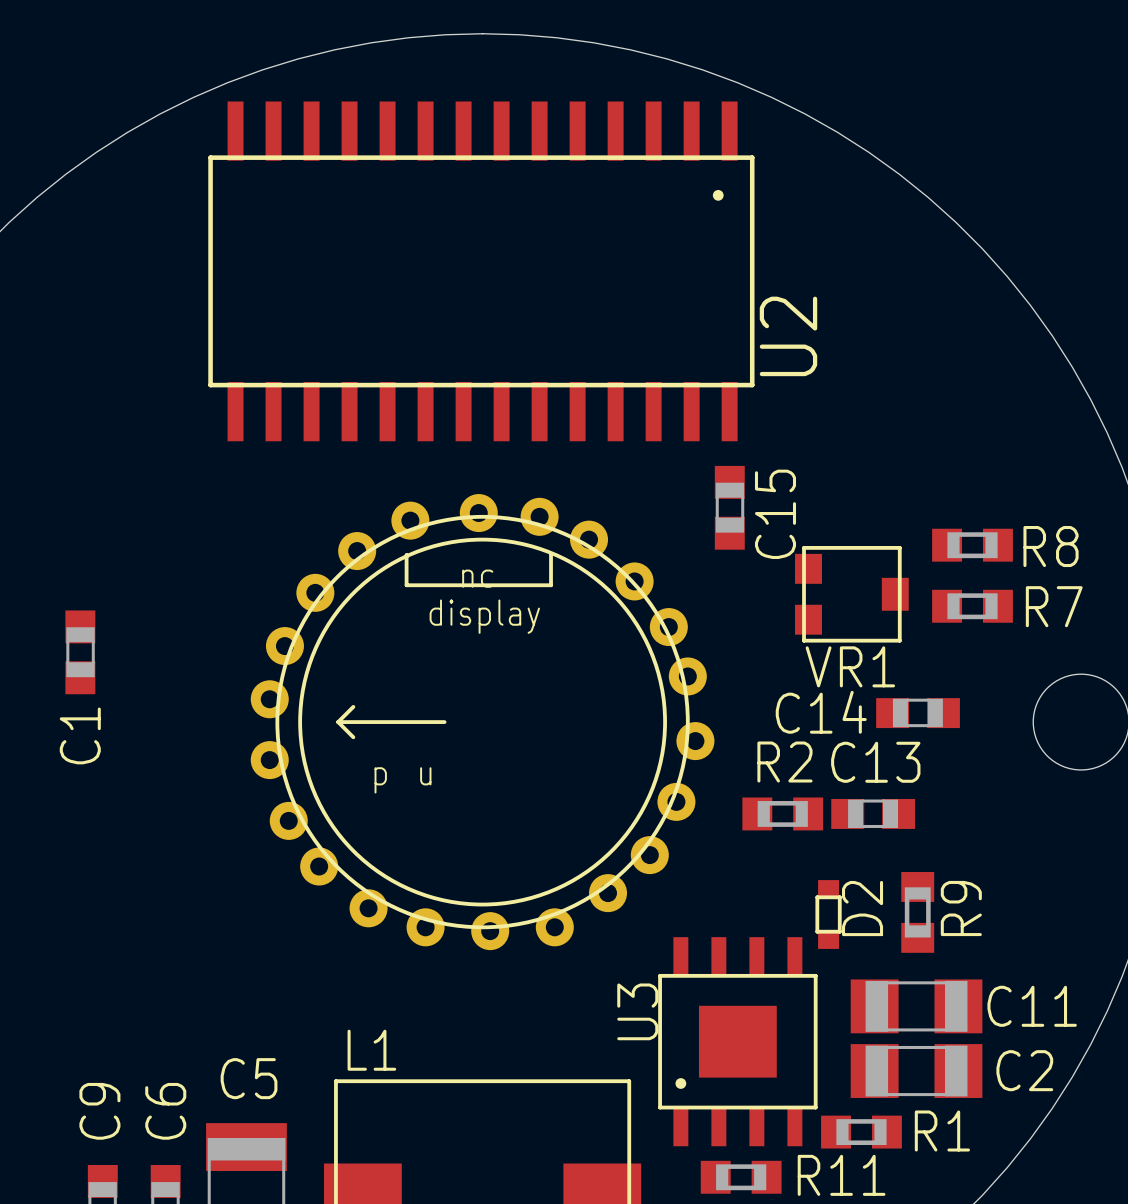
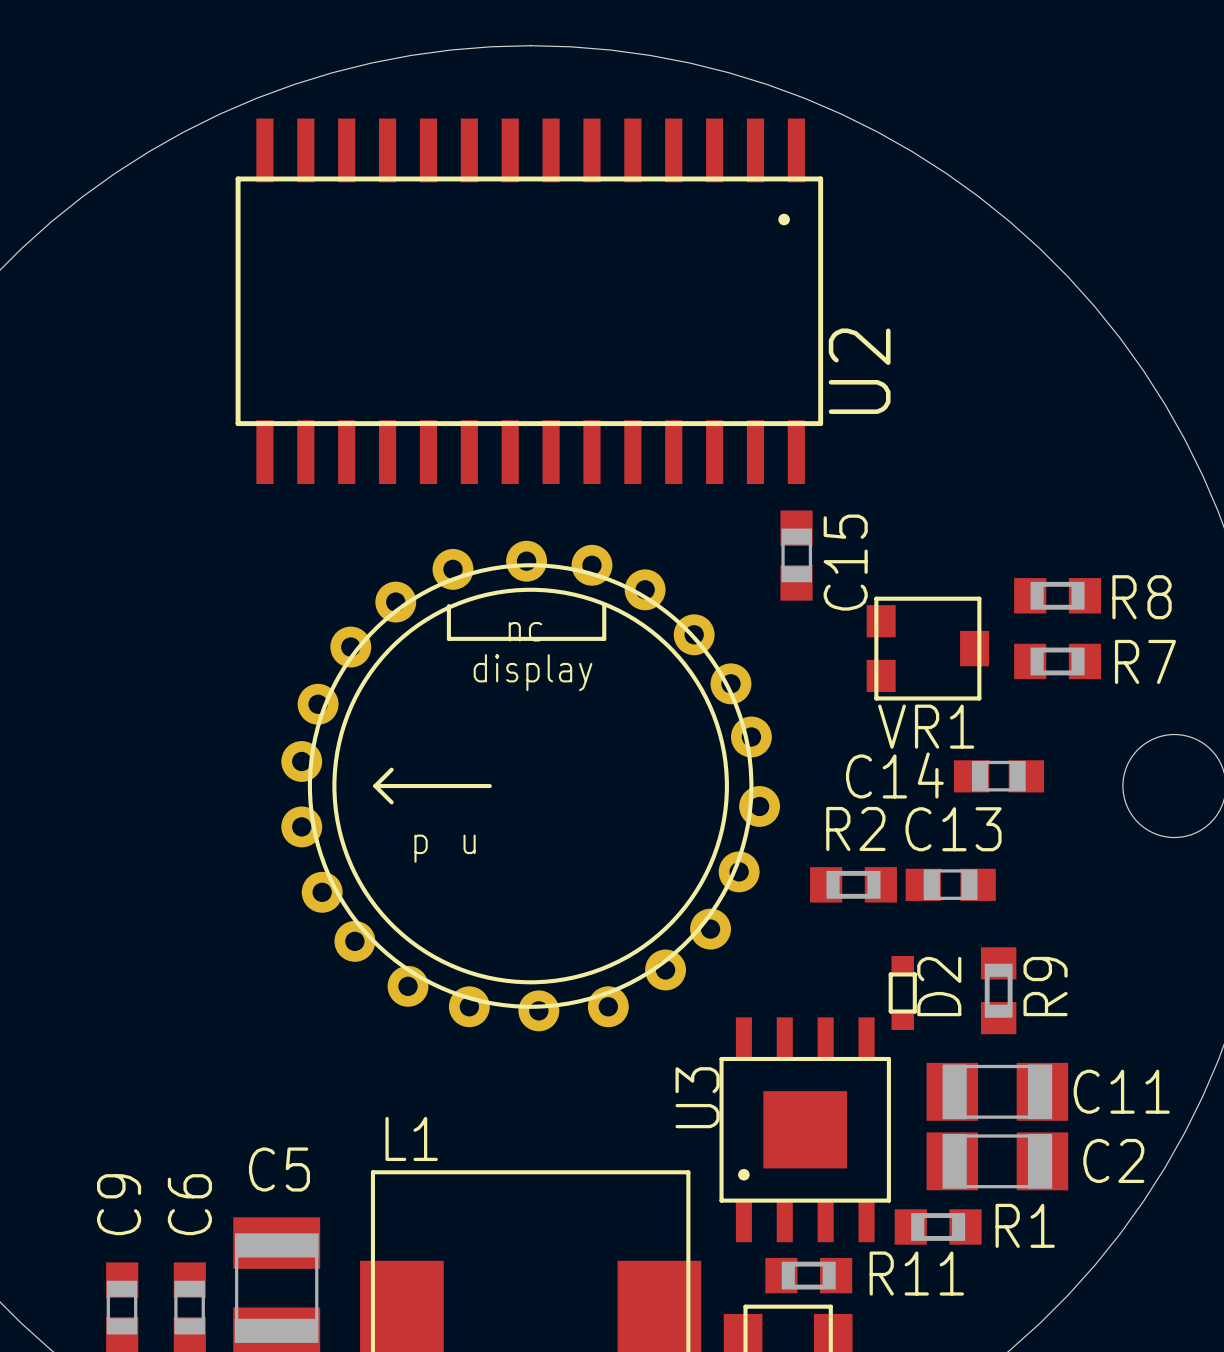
C1: (80, 652) -> none

